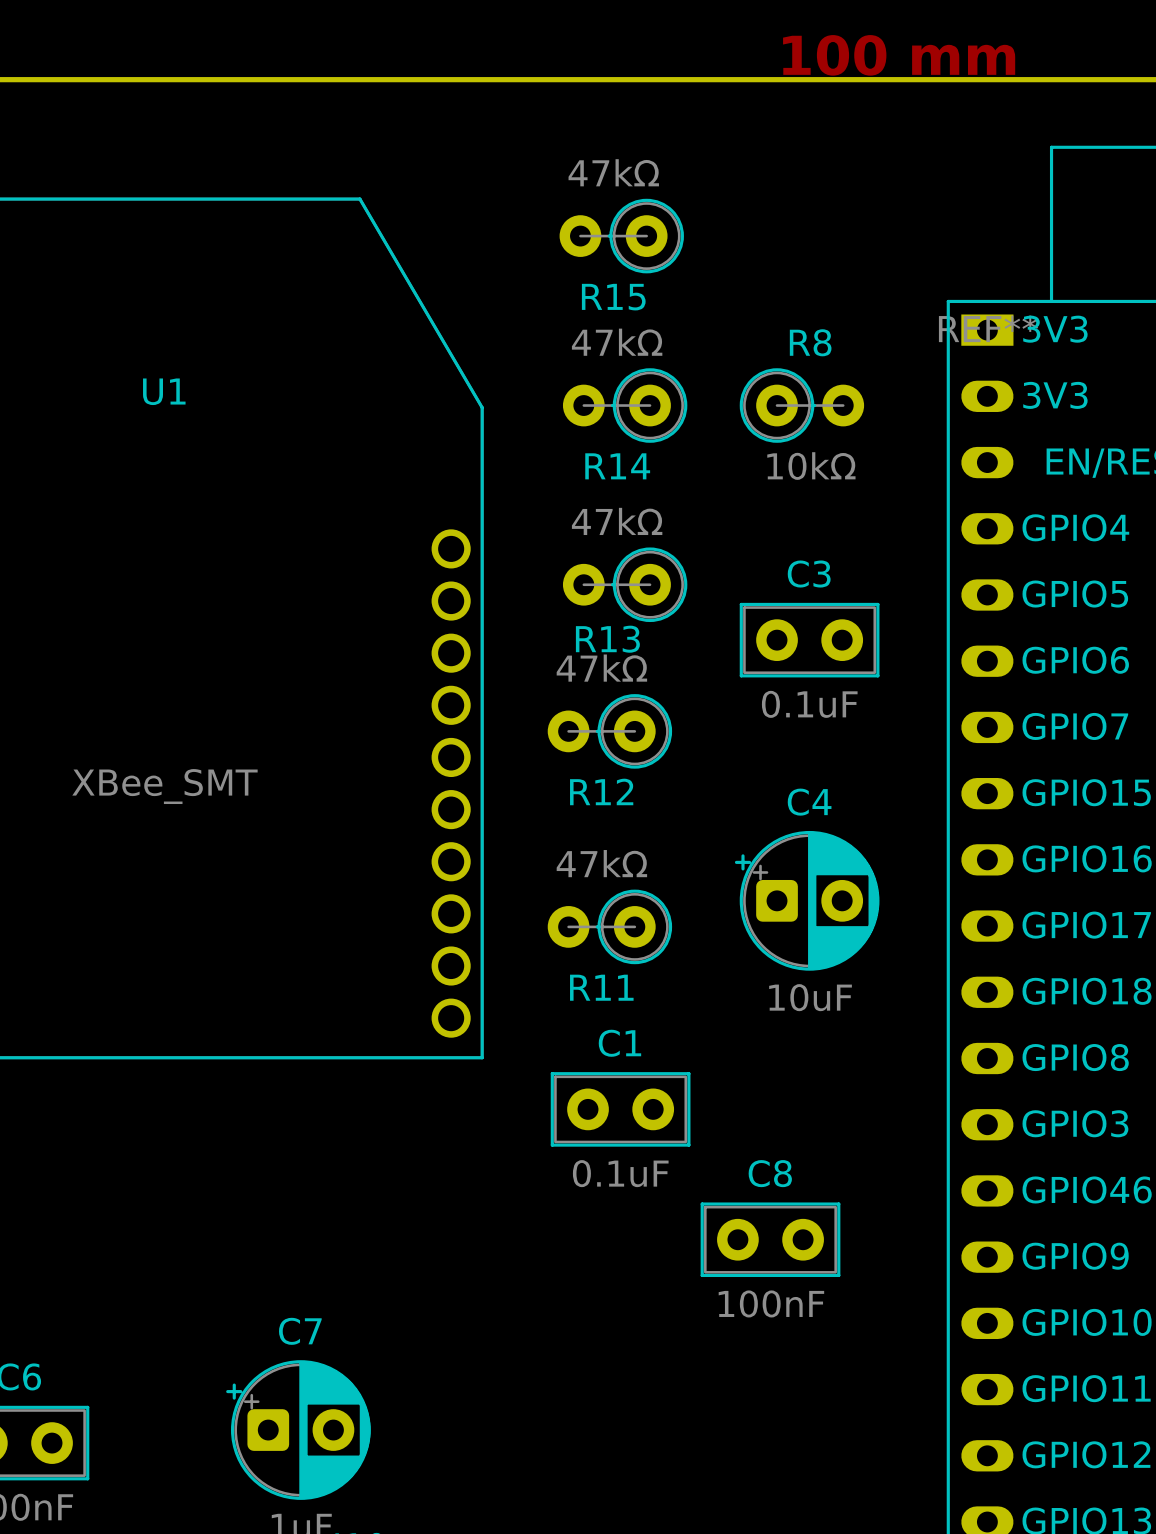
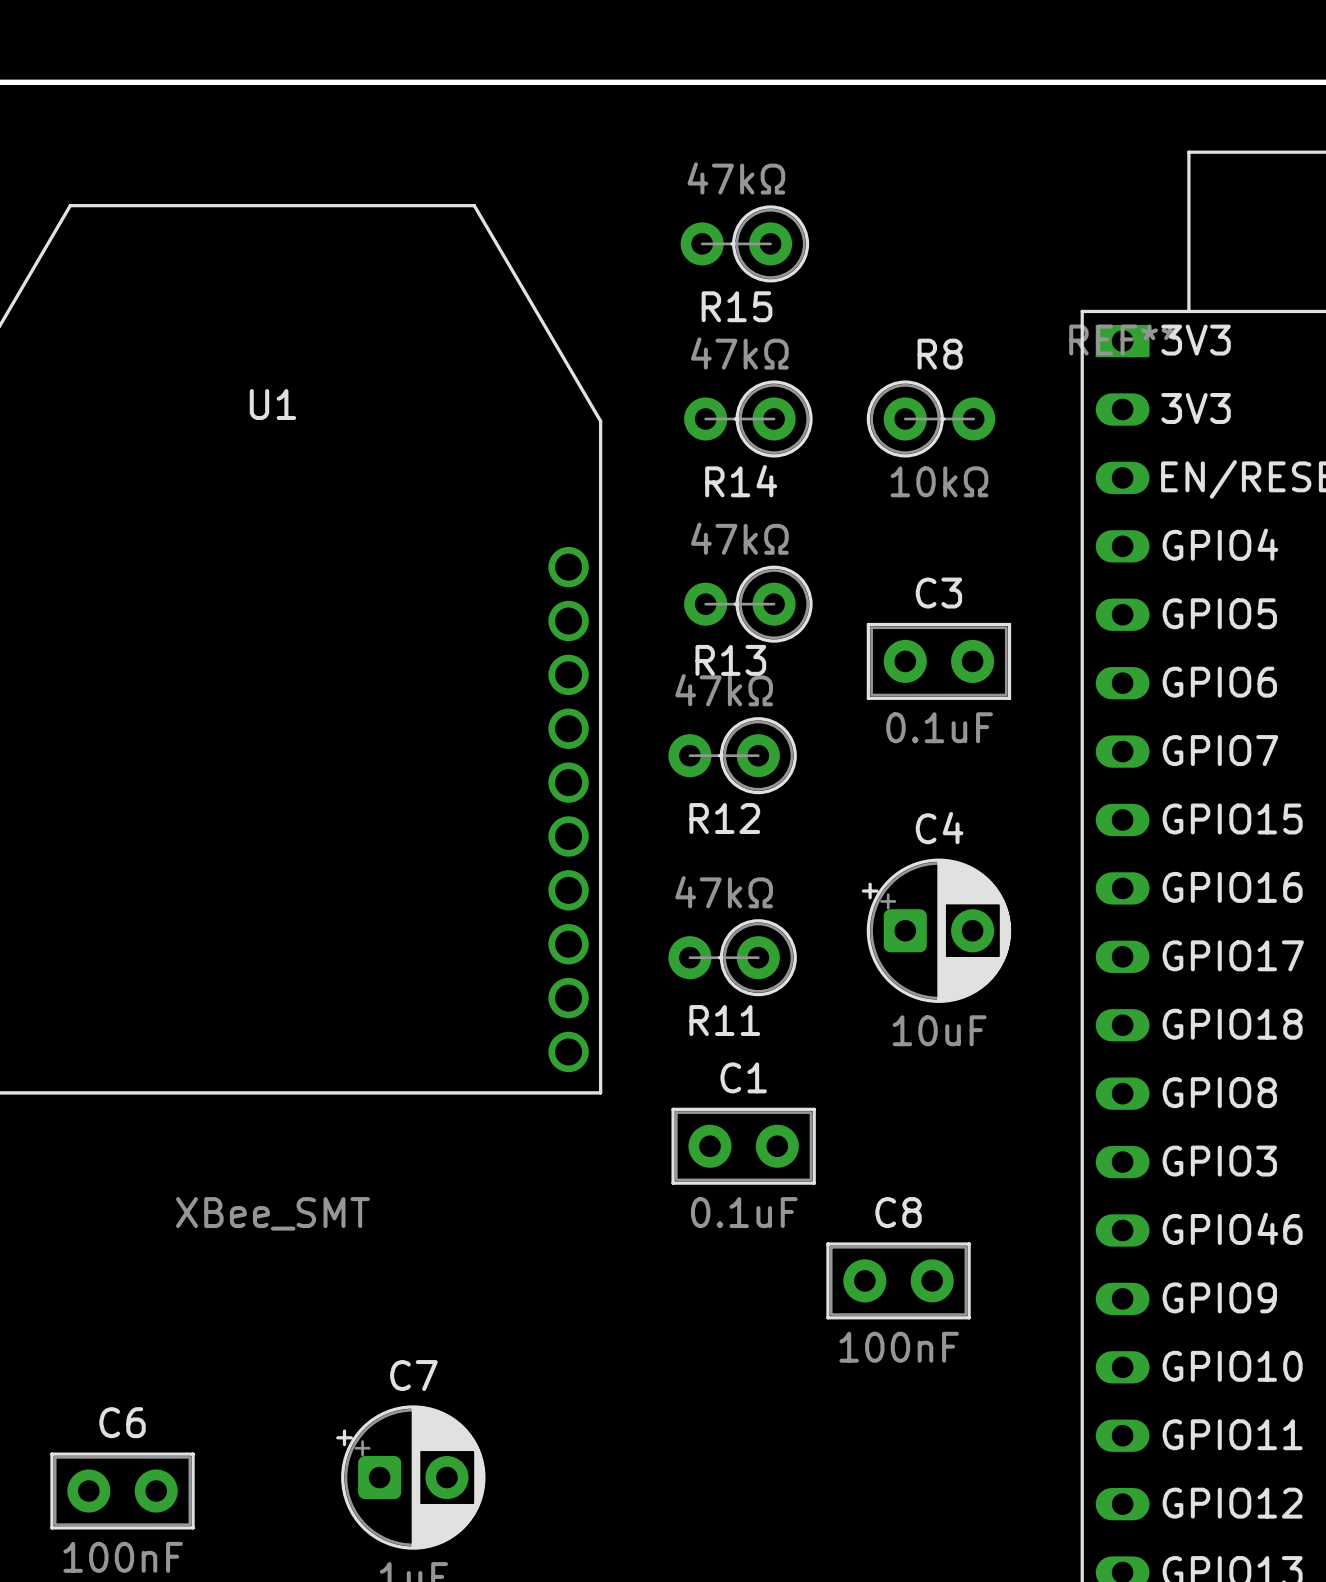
text: 100 mm (899, 55) -> none
U1 value position: XBee_SMT (164, 786) -> XBee_SMT (272, 1213)

